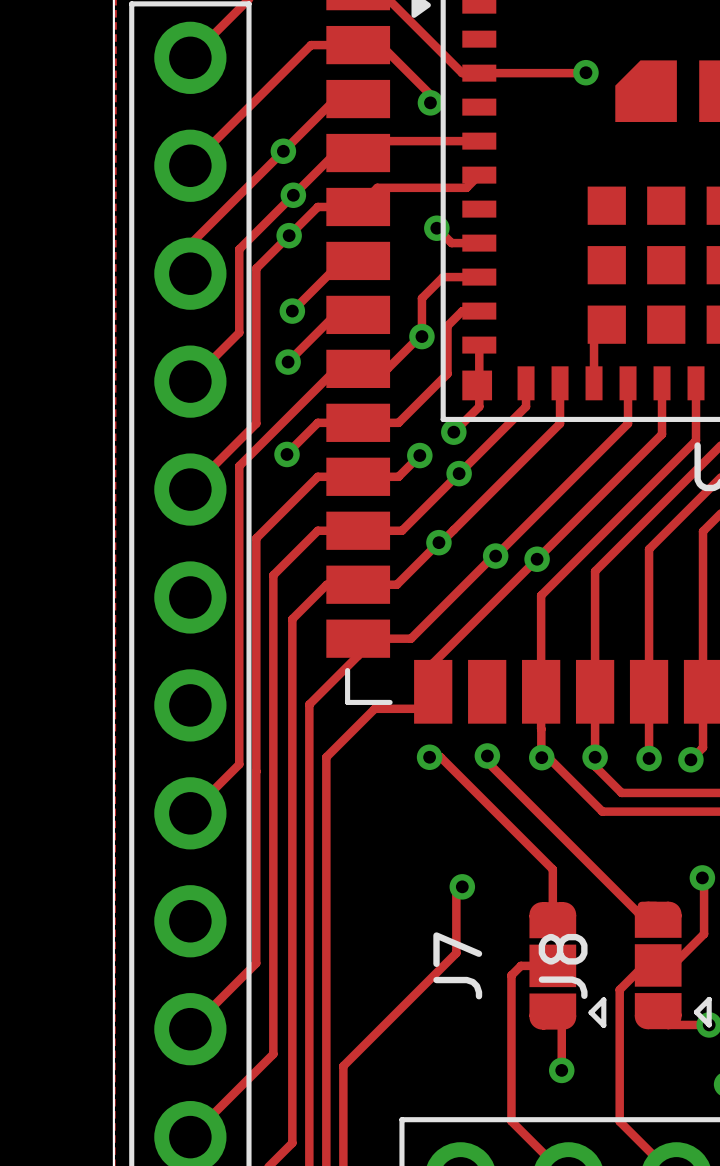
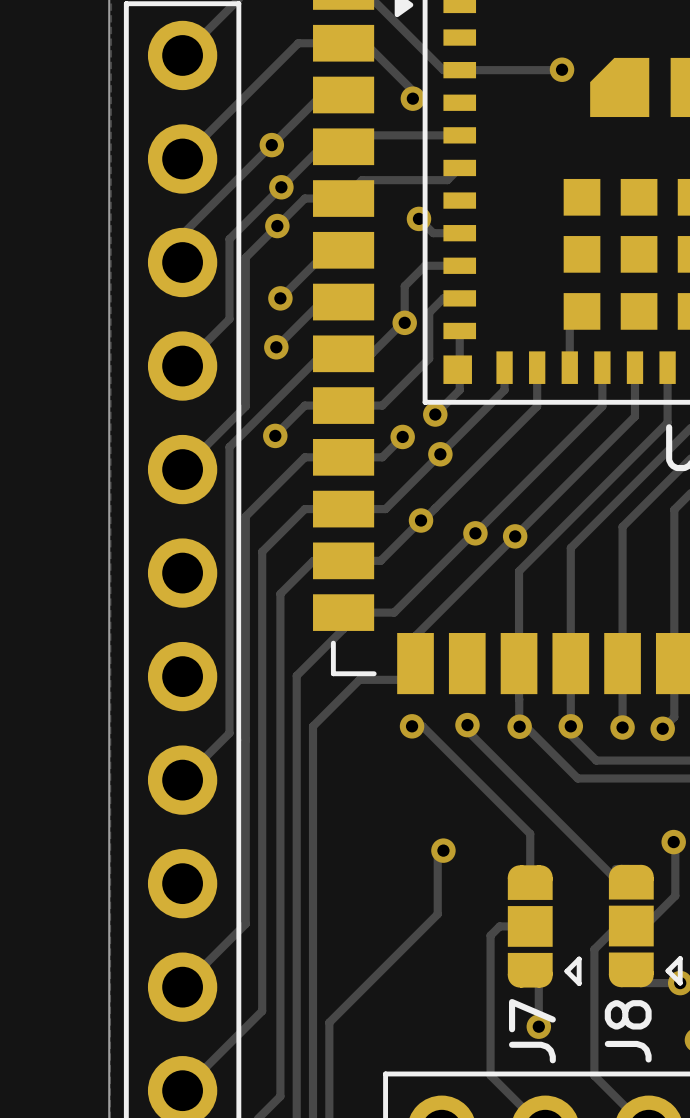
J7 name position: J7 (457, 965) -> J7 (532, 1031)
J8 name position: J8 (563, 966) -> J8 (628, 1031)

